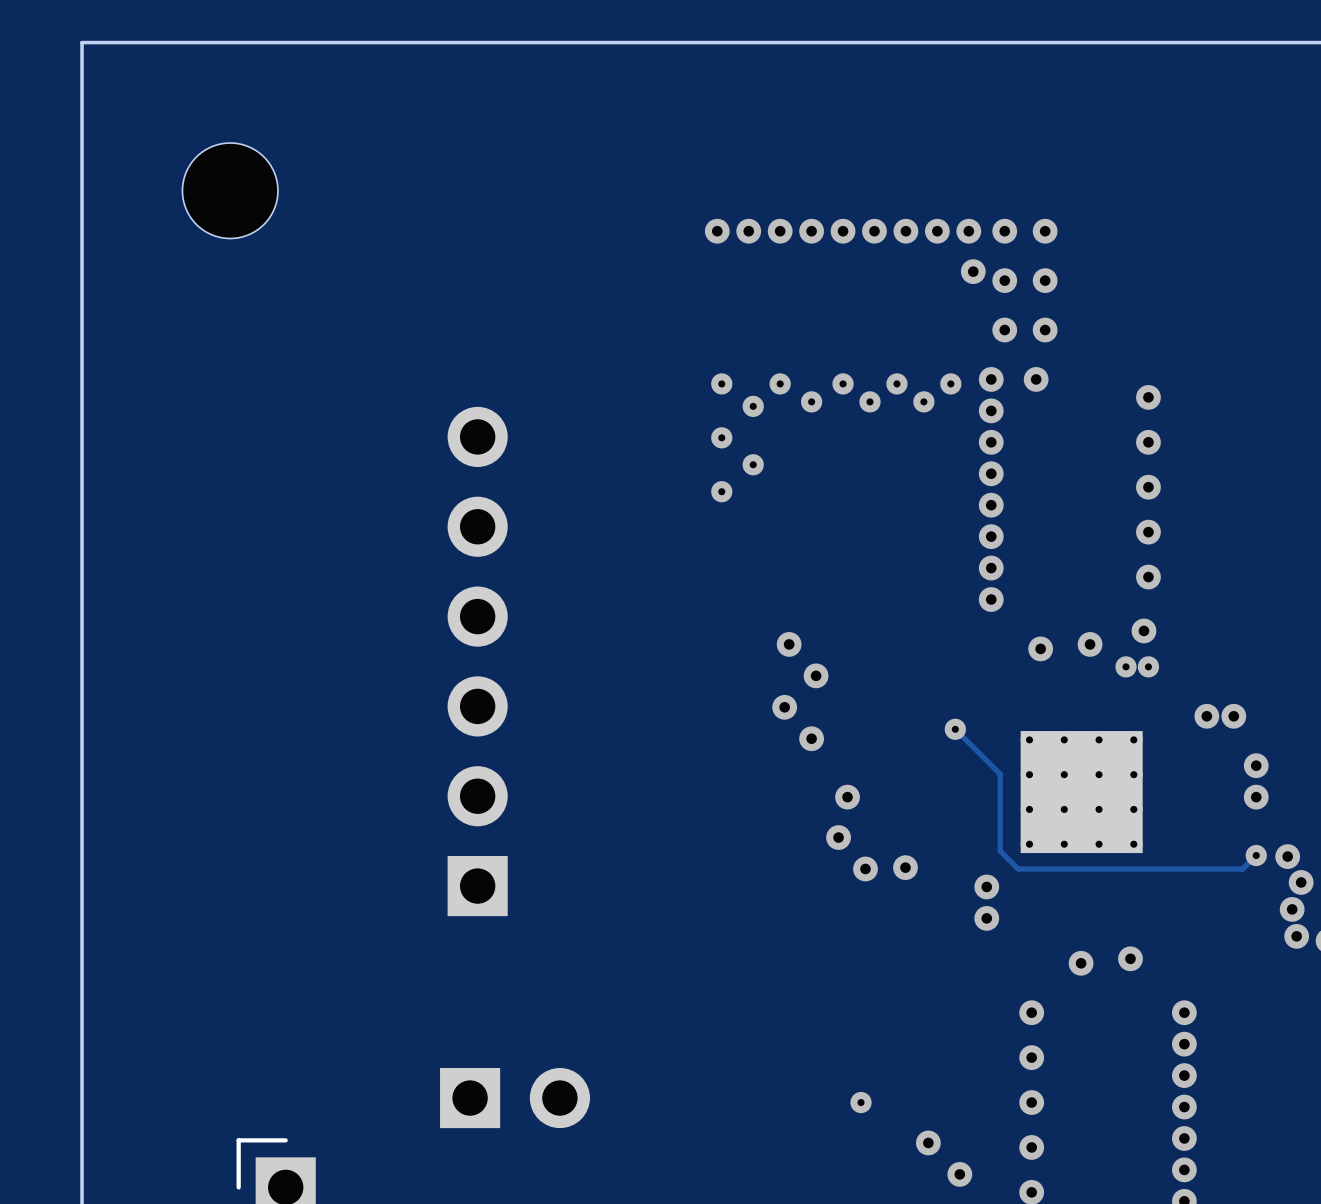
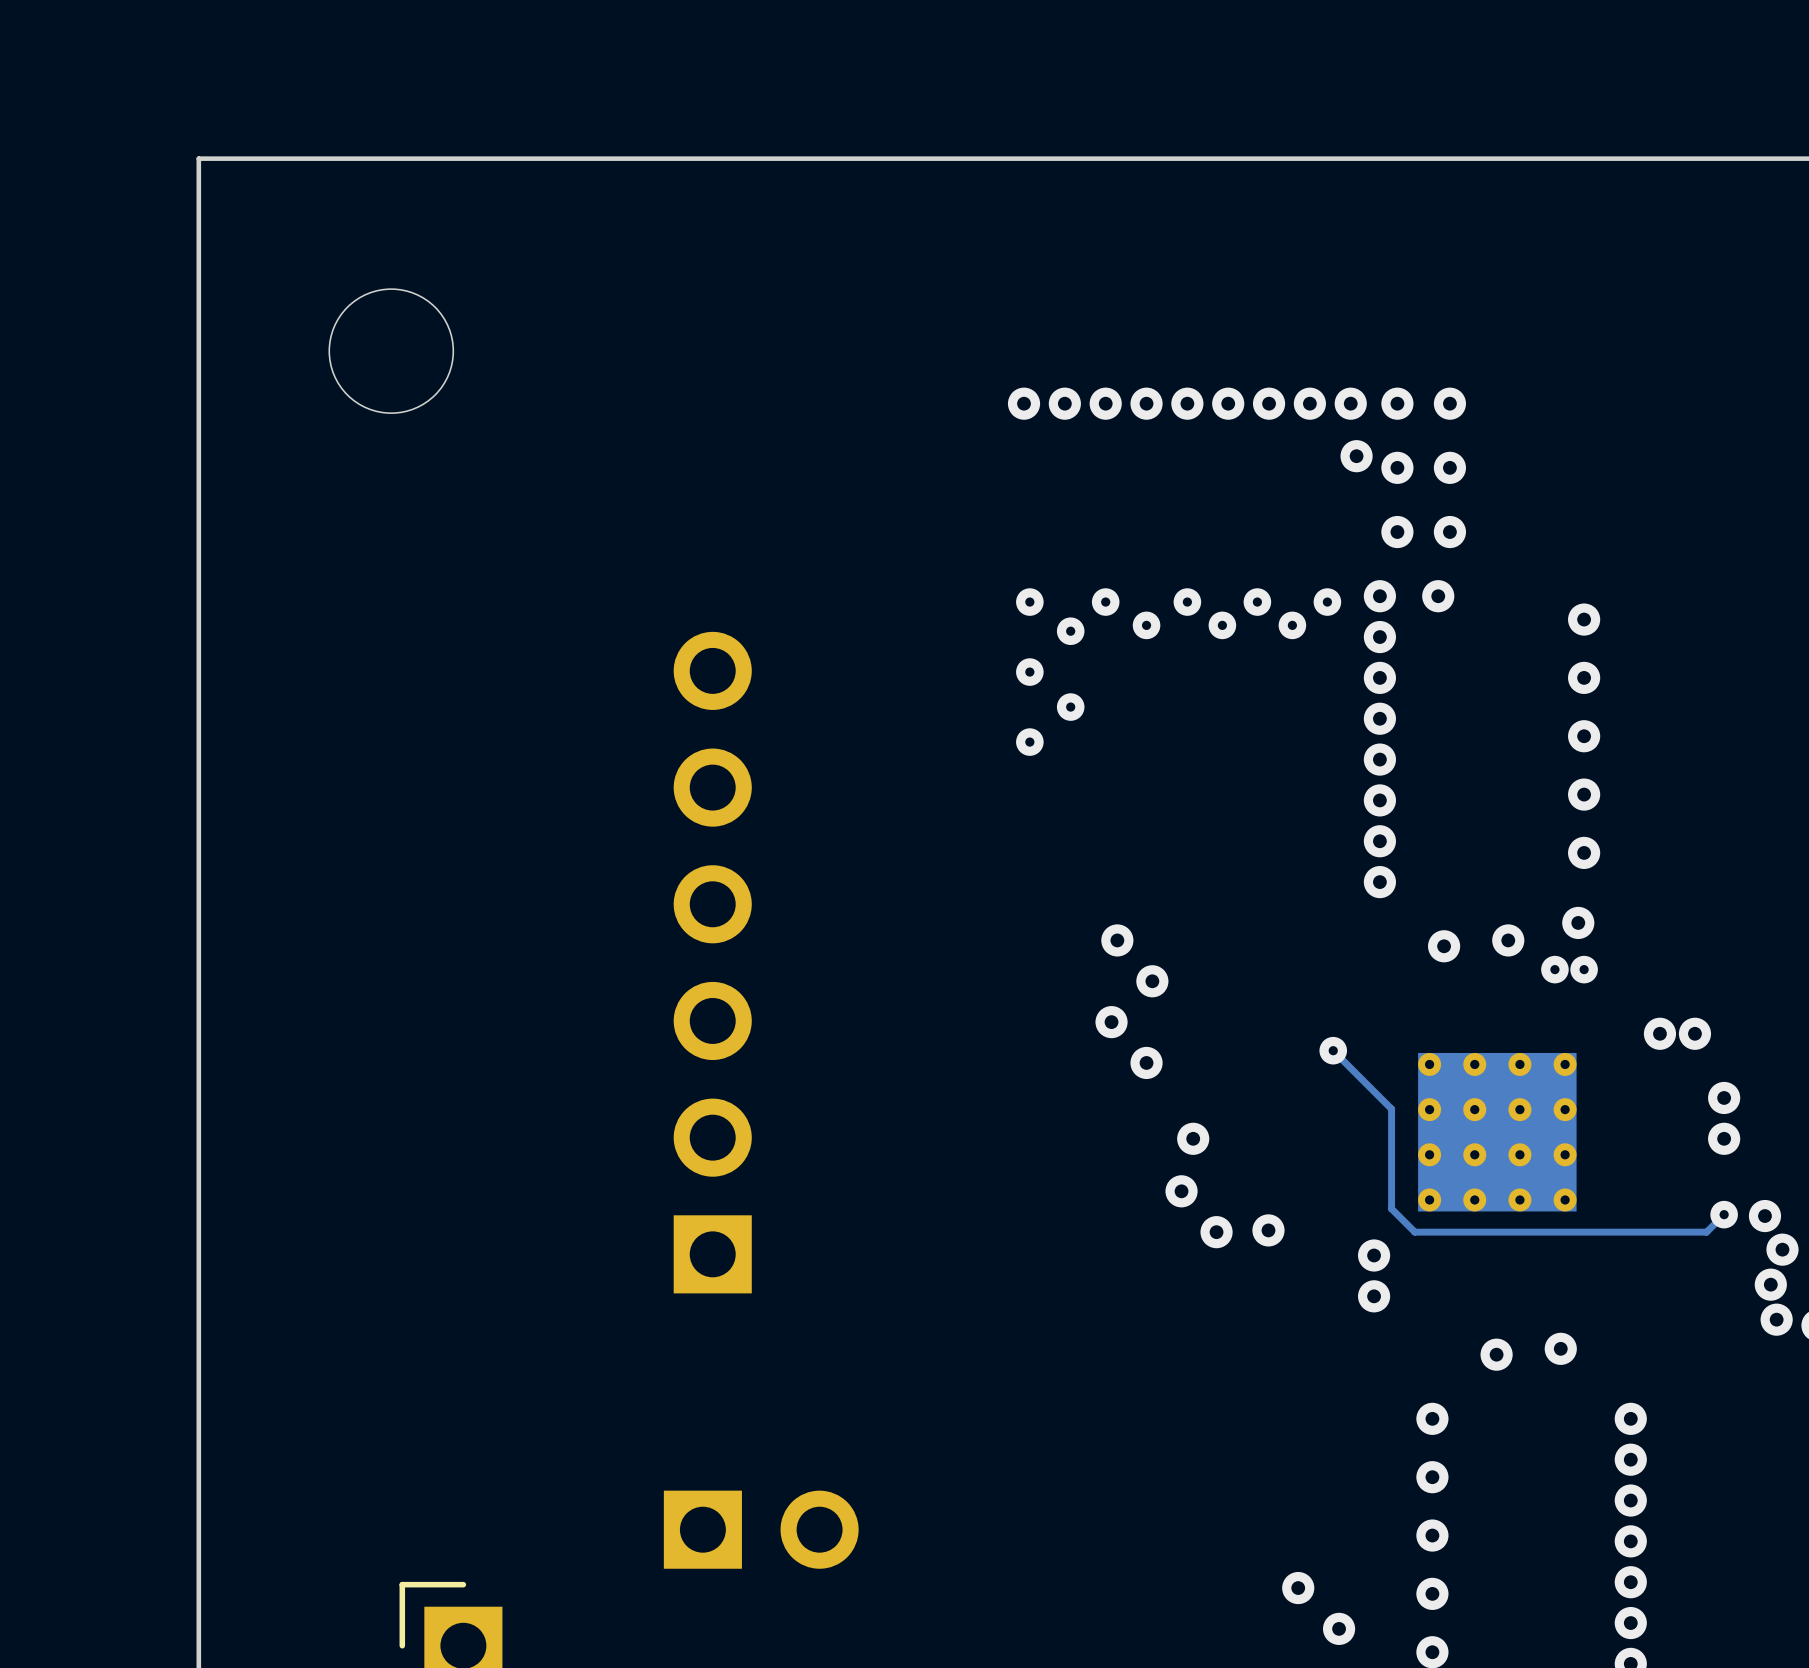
via: (861, 1102) -> none

